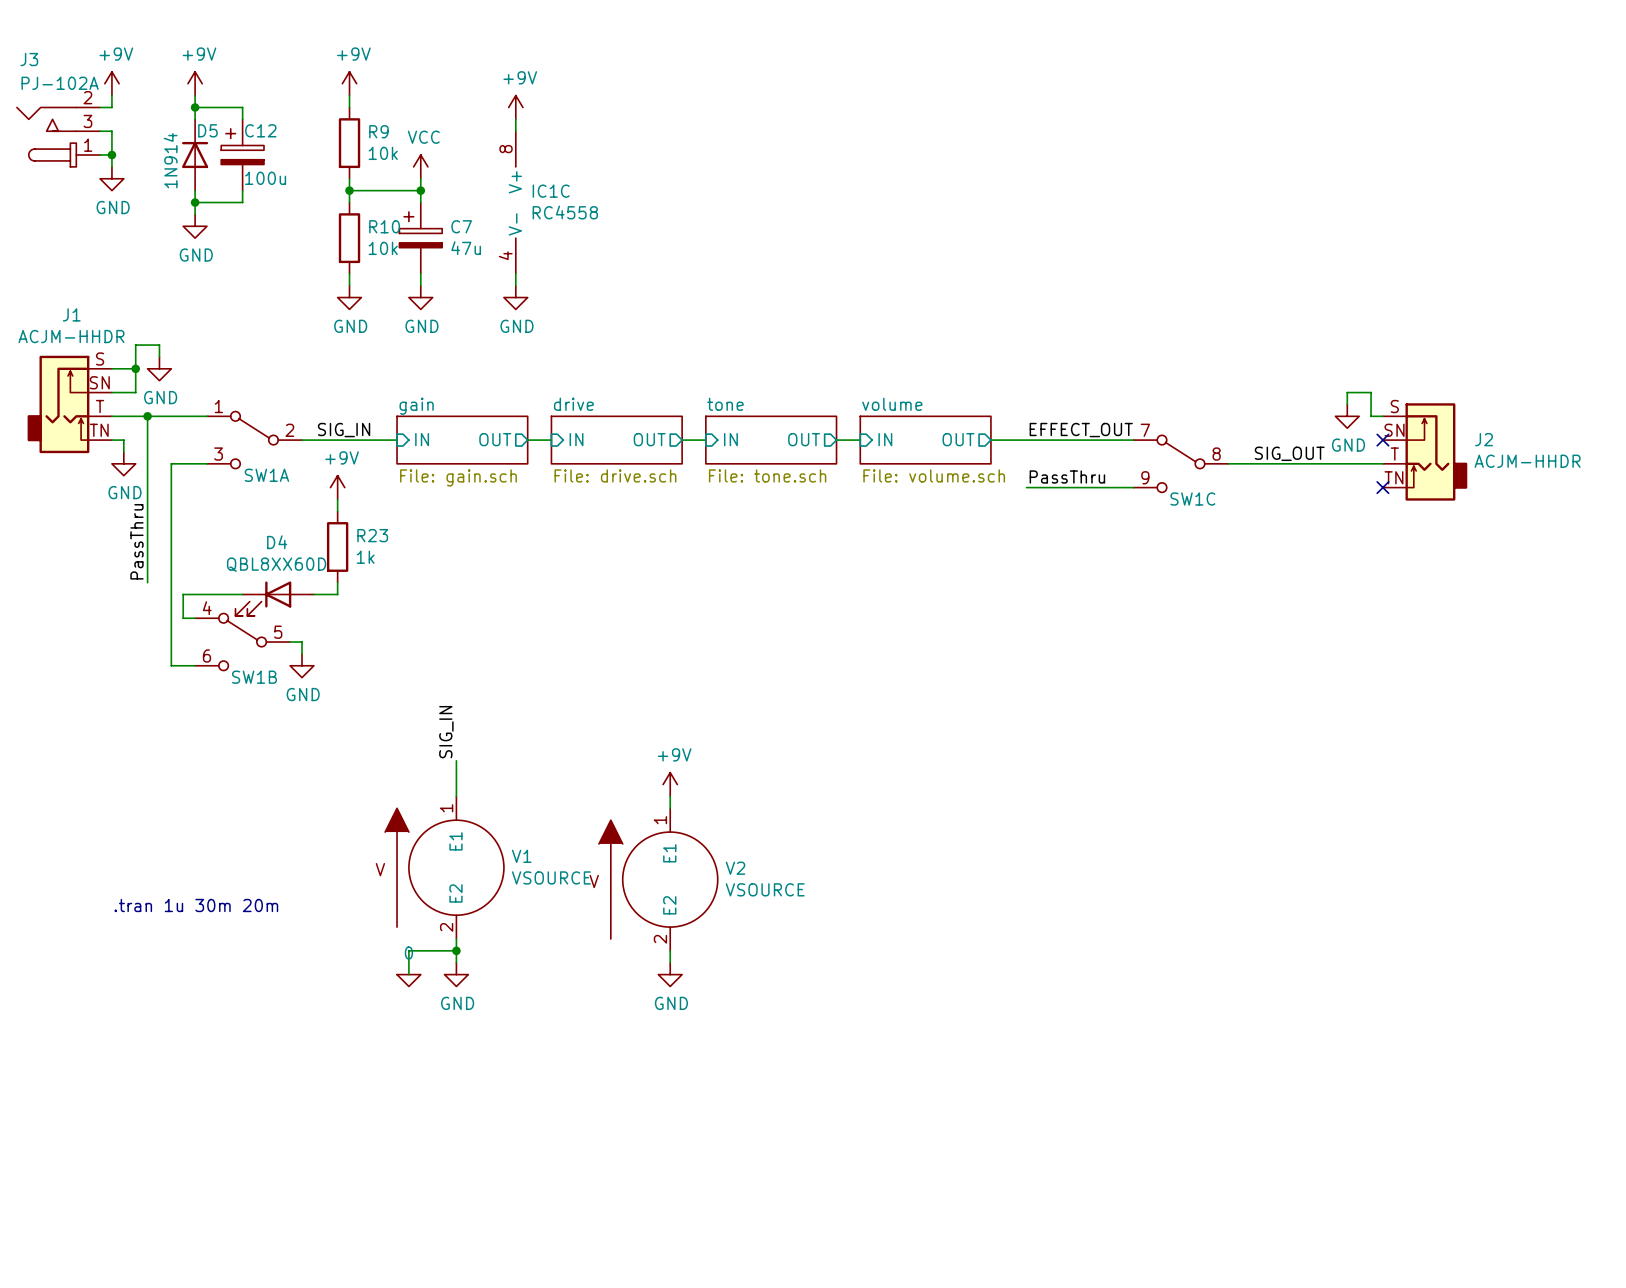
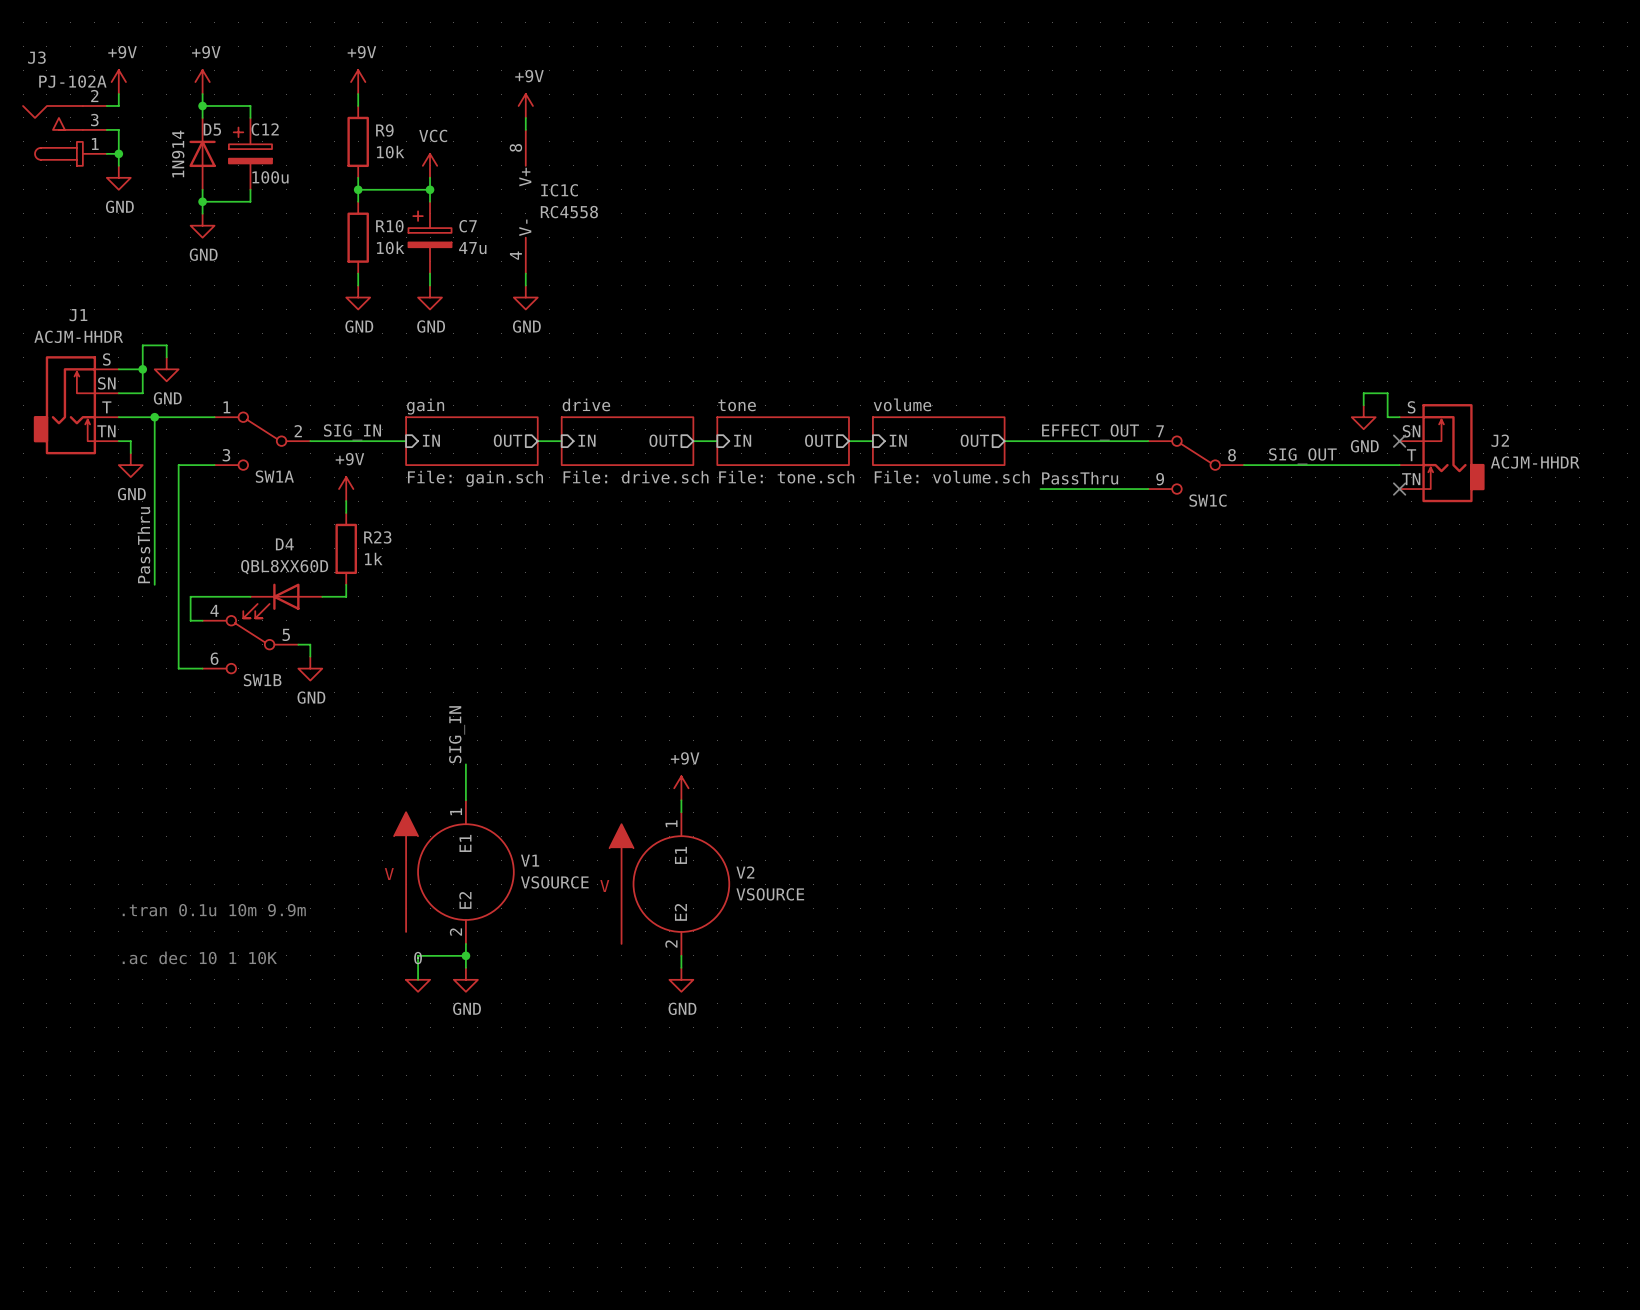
text: .tran 1u 30m 20m (196, 905) -> .tran 0.1u 10m 9.9m (214, 910)
text: none -> .ac dec 10 1 10K (199, 957)

